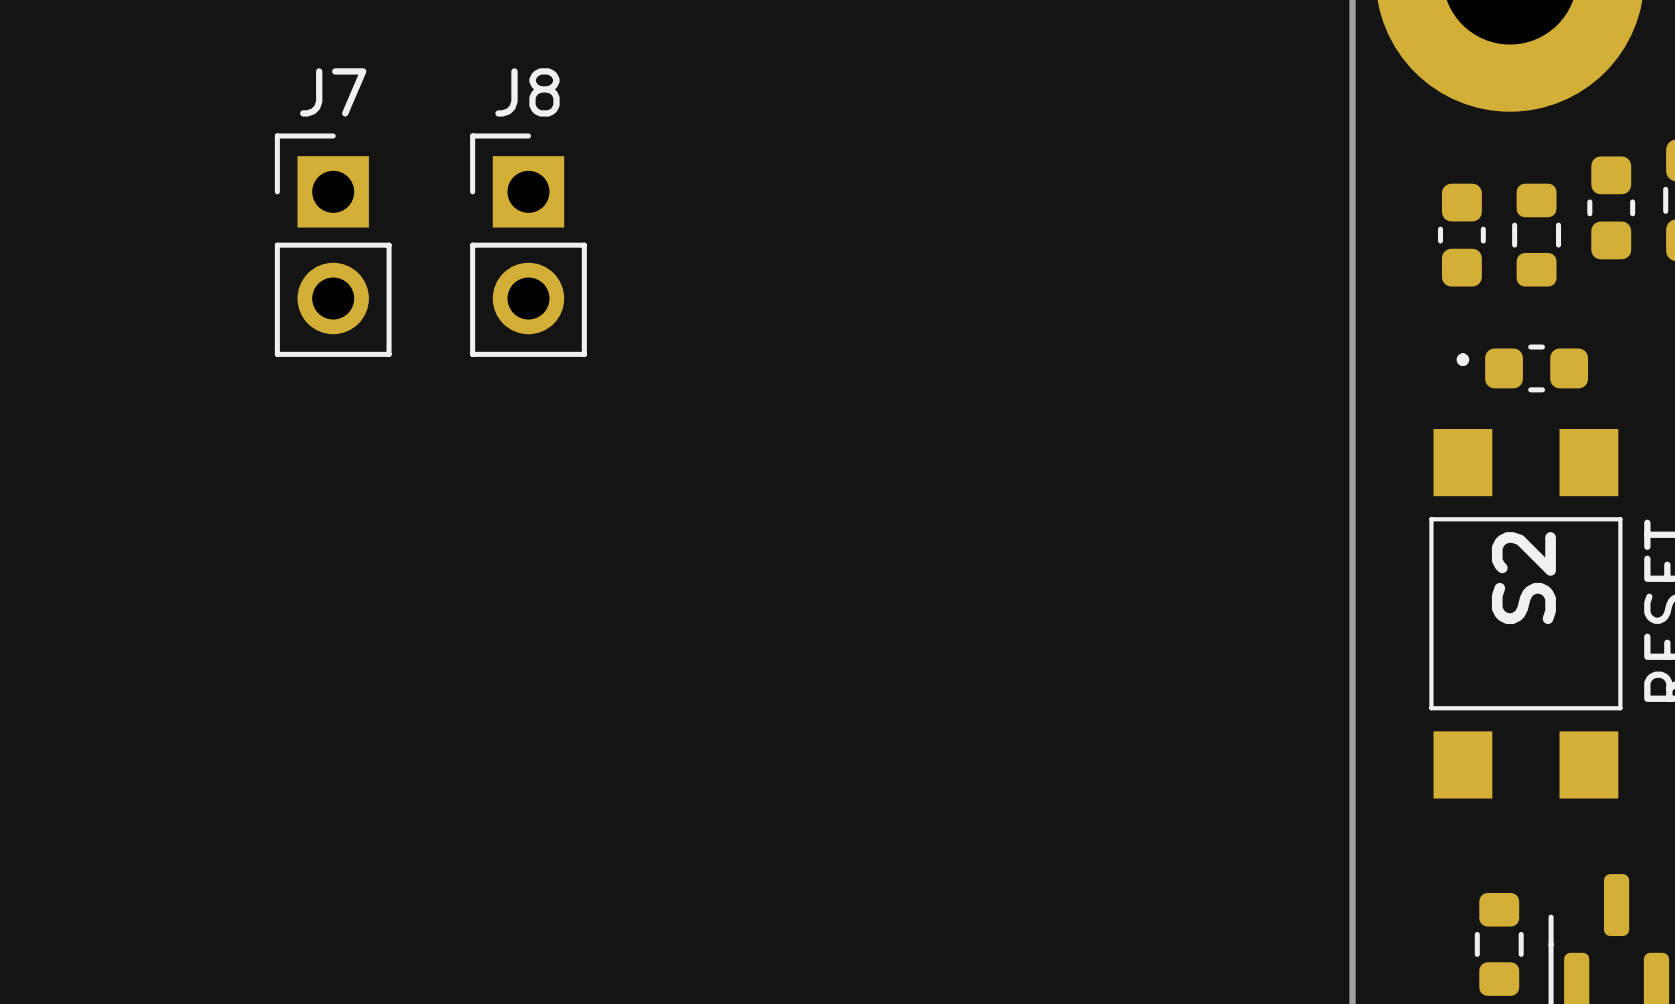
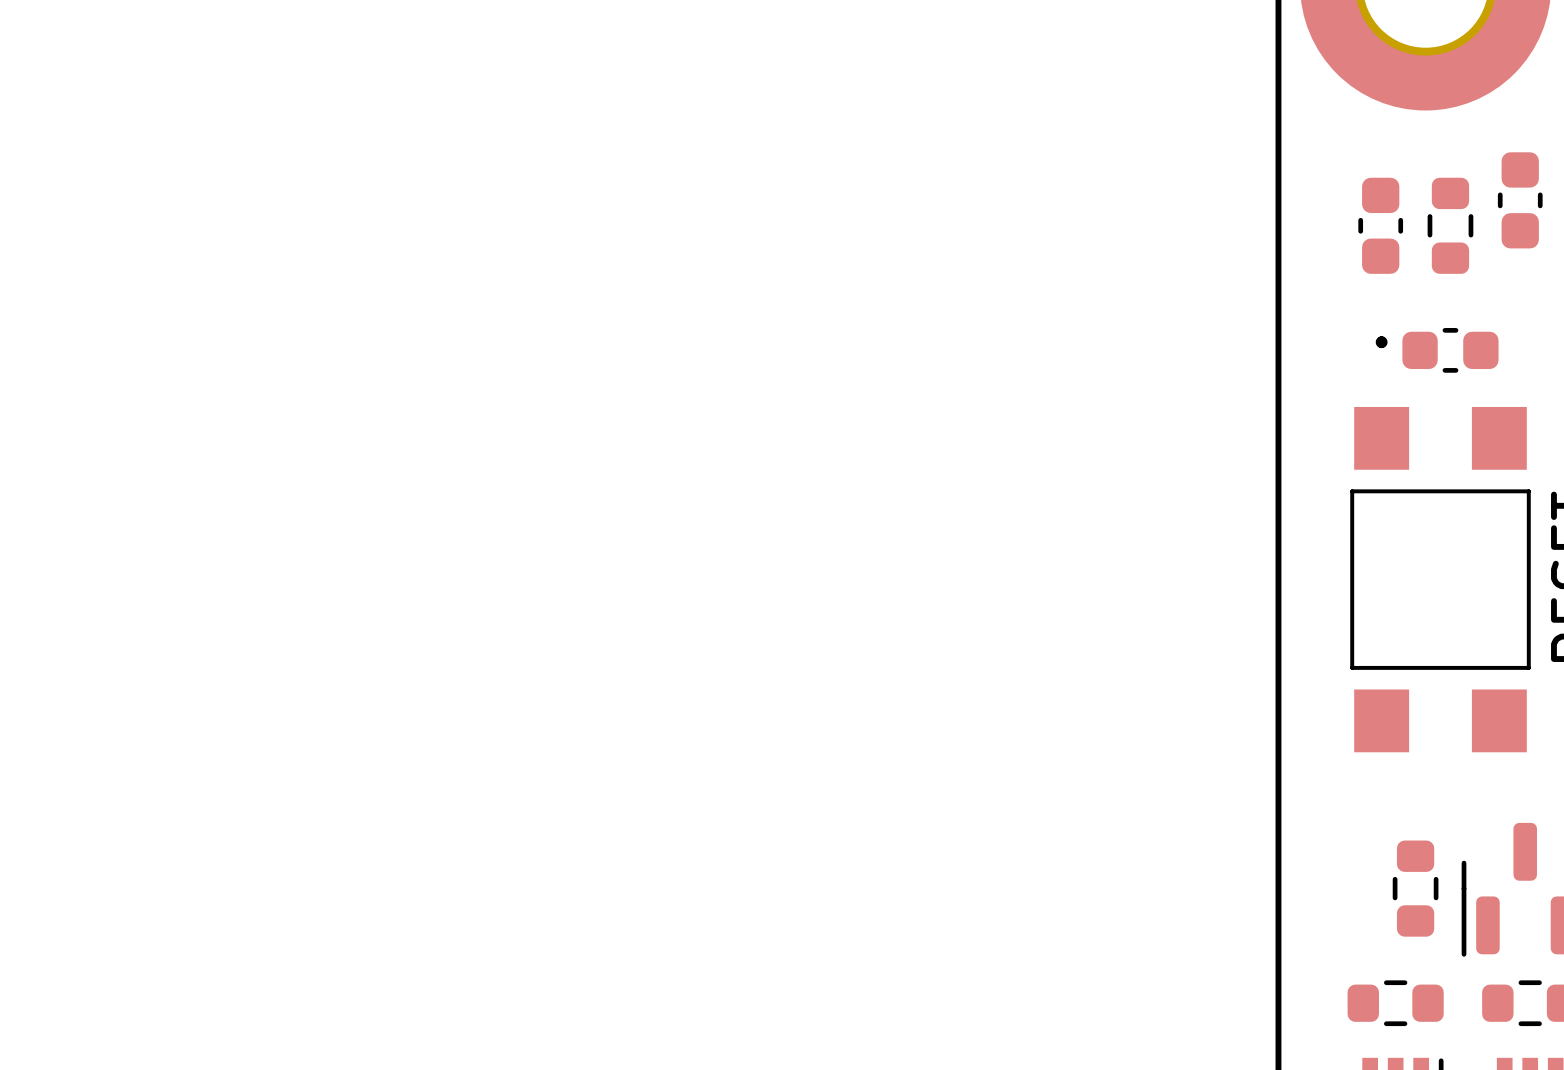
J7: (333, 245) -> none
J8: (528, 245) -> none
S2 name: S2 (1523, 578) -> none

